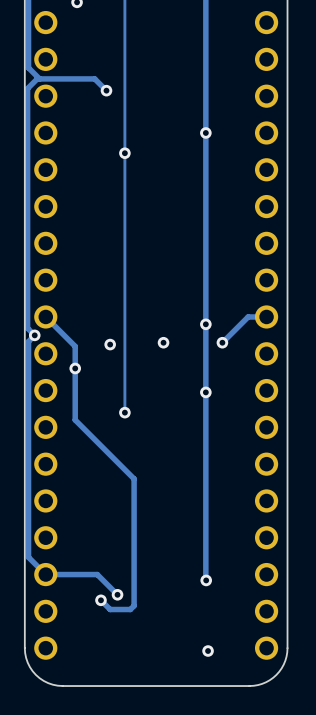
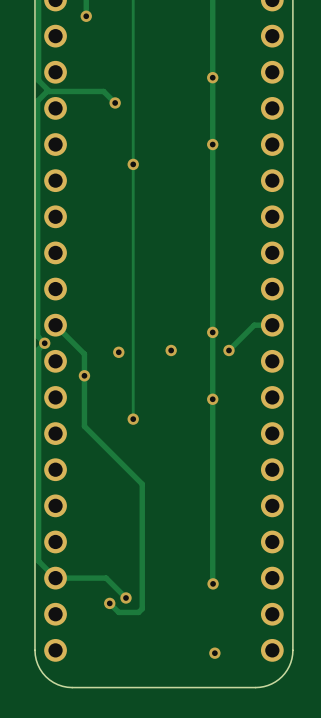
via: none -> (212, 77)

